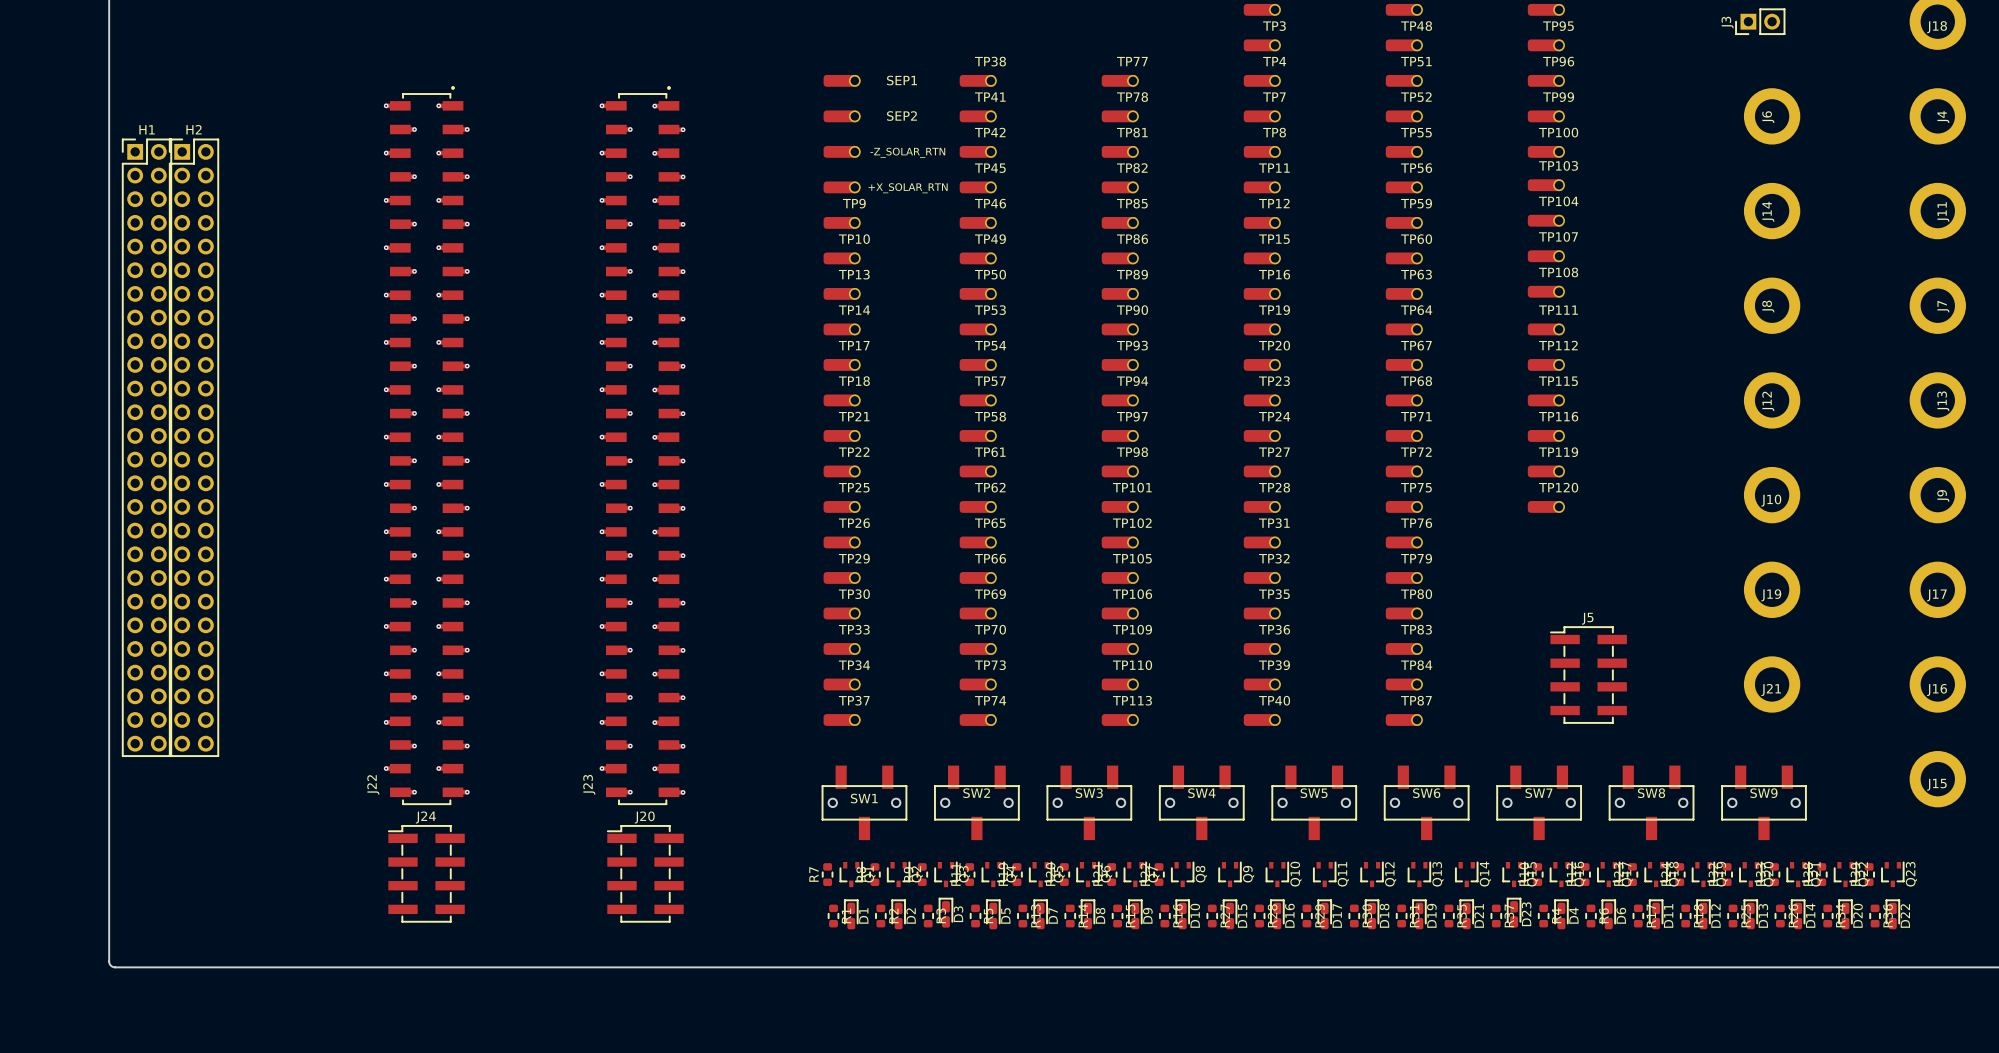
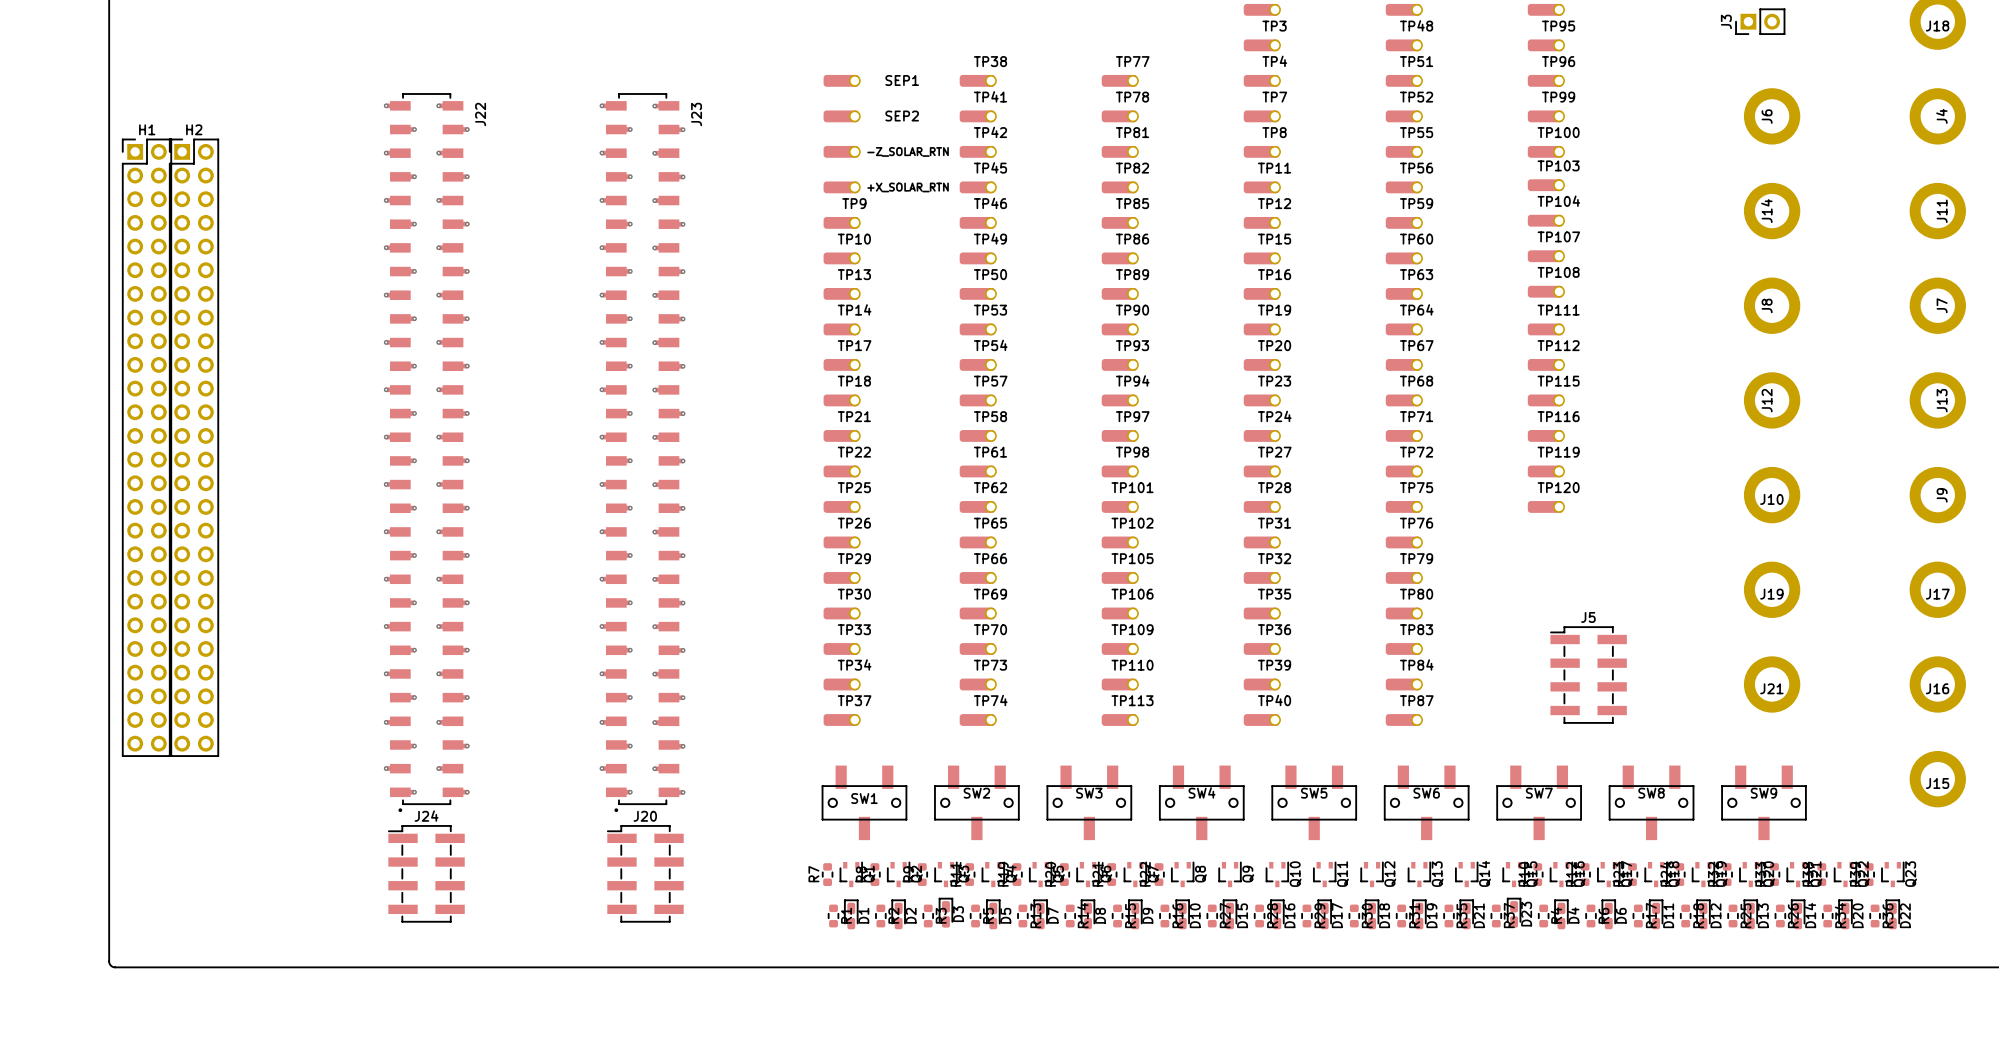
J22 rotation: 0° (426, 445) -> 180° (426, 452)
J23 rotation: 0° (642, 445) -> 180° (642, 452)

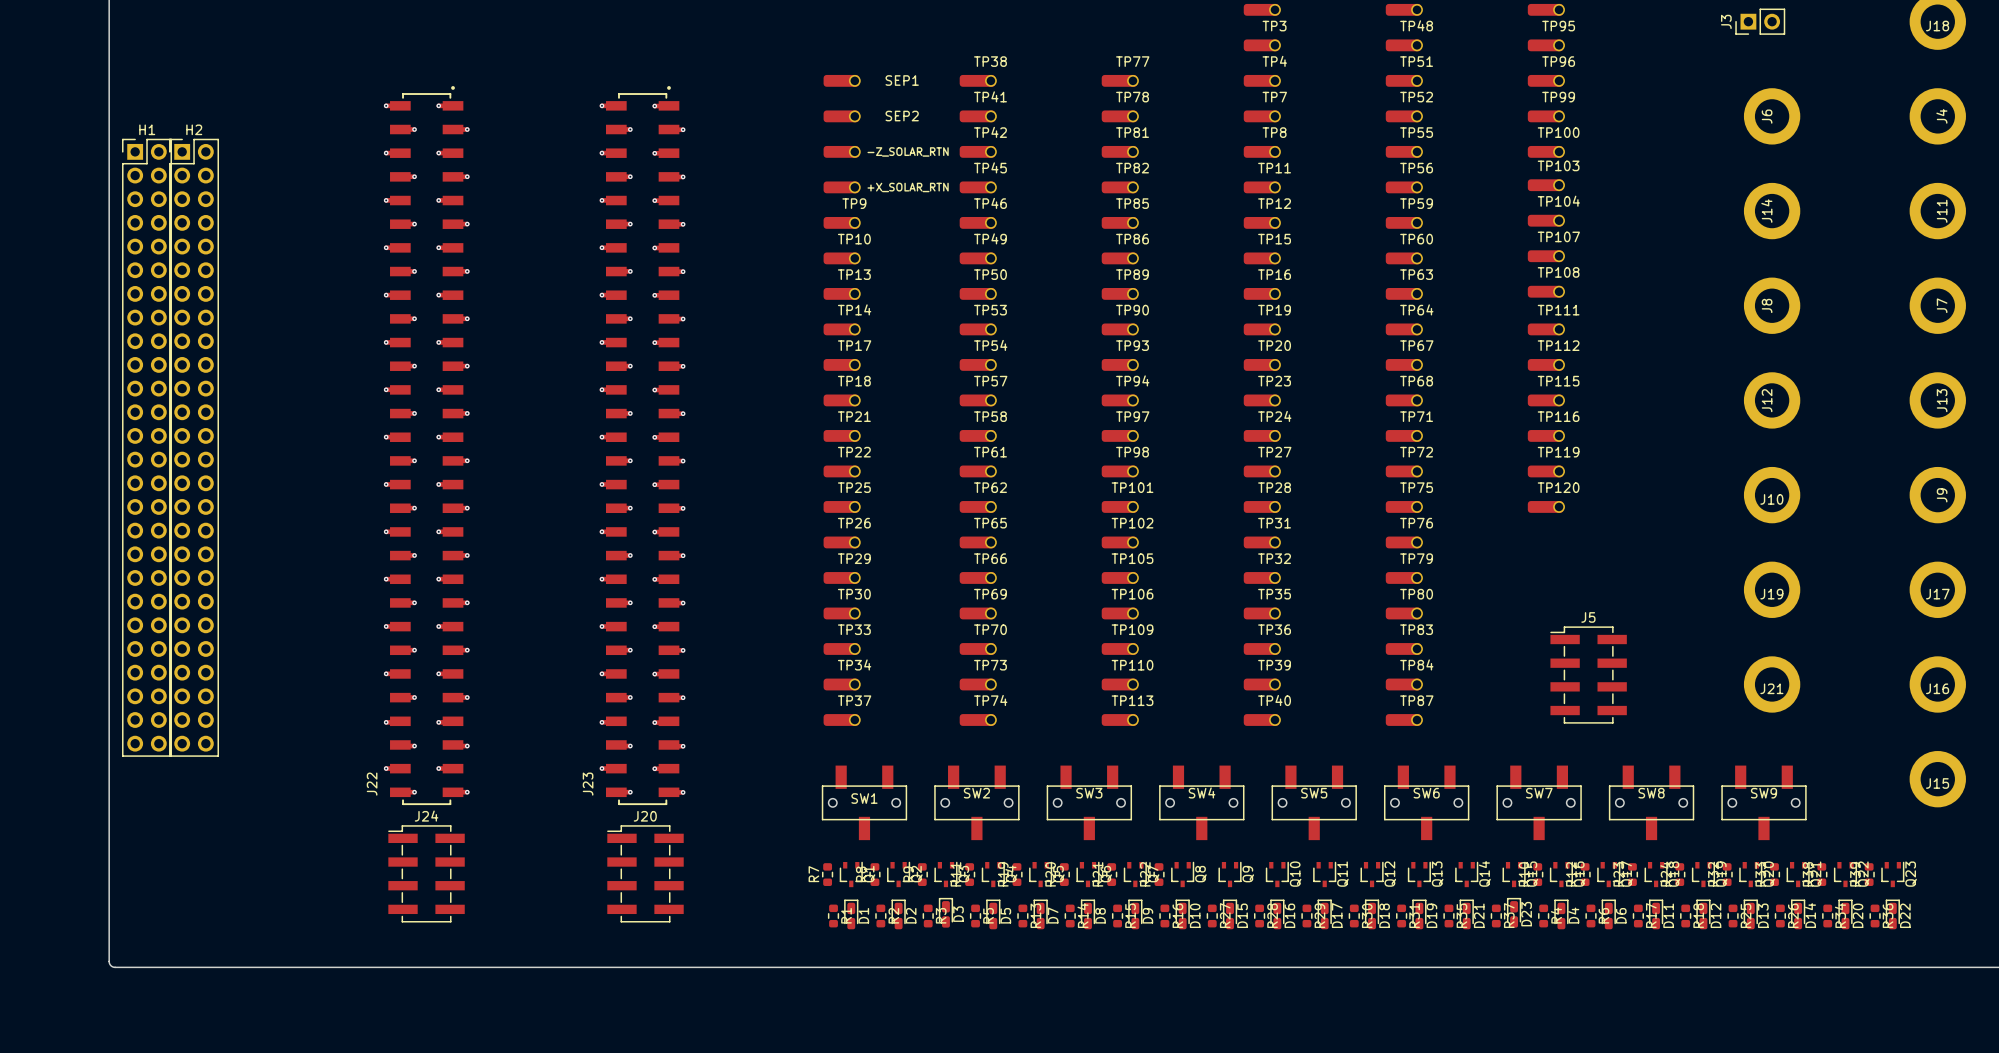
J22 rotation: 0° (426, 452) -> 180° (426, 445)
J23 rotation: 0° (642, 452) -> 180° (642, 445)

